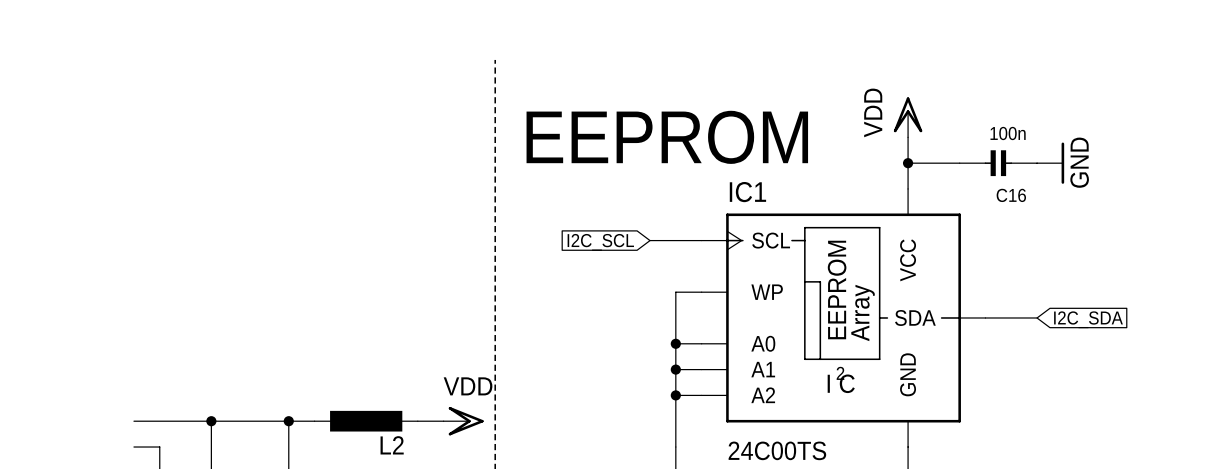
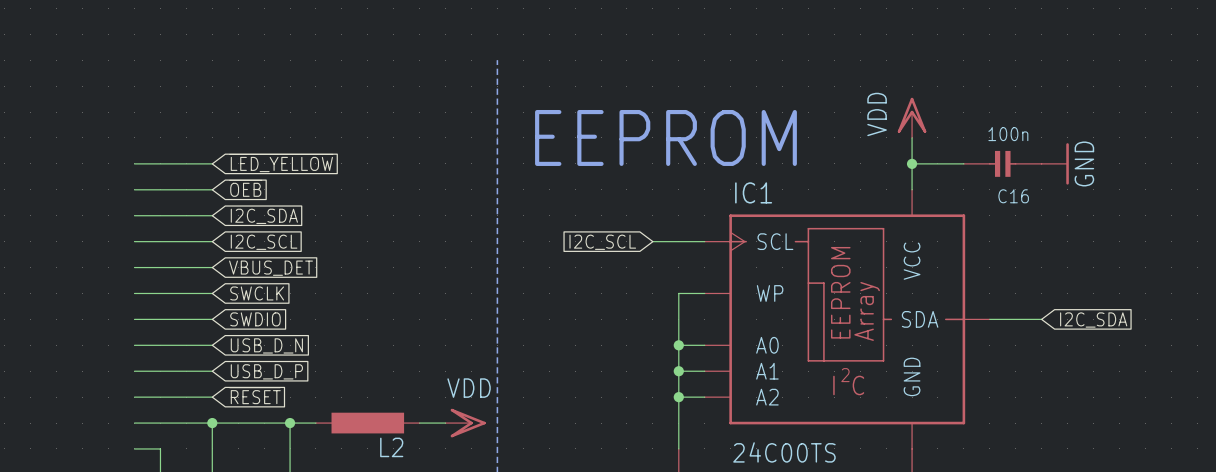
wire: none -> (134, 163) (212, 163)
global label: none -> ~{LED_YELLOW} (281, 163)
global label: none -> ~{OEB} (245, 188)
wire: none -> (134, 189) (212, 189)
wire: none -> (134, 215) (212, 215)
global label: none -> I2C_SDA (264, 216)
wire: none -> (134, 241) (212, 241)
global label: none -> I2C_SCL (264, 242)
wire: none -> (134, 267) (212, 267)
global label: none -> VBUS_DET (271, 268)
wire: none -> (134, 293) (212, 293)
global label: none -> SWCLK (257, 293)
wire: none -> (134, 319) (212, 319)
global label: none -> SWDIO (255, 319)
wire: none -> (134, 345) (212, 345)
global label: none -> USB_D_N (266, 345)
wire: none -> (134, 371) (212, 371)
global label: none -> USB_D_P (266, 371)
global label: none -> ~{RESET} (254, 395)
wire: none -> (134, 397) (212, 397)

